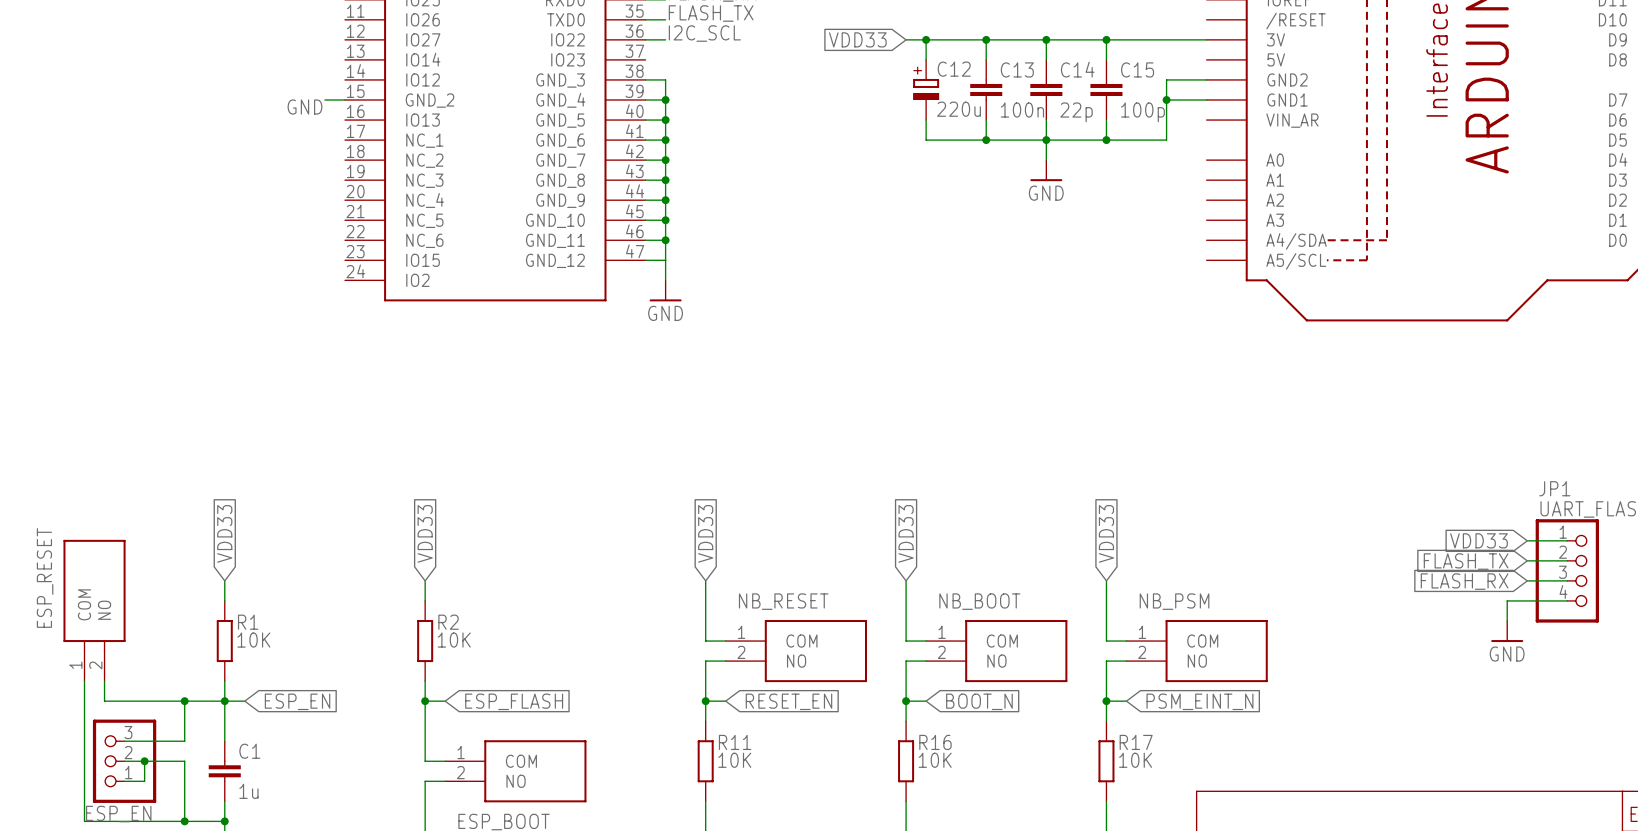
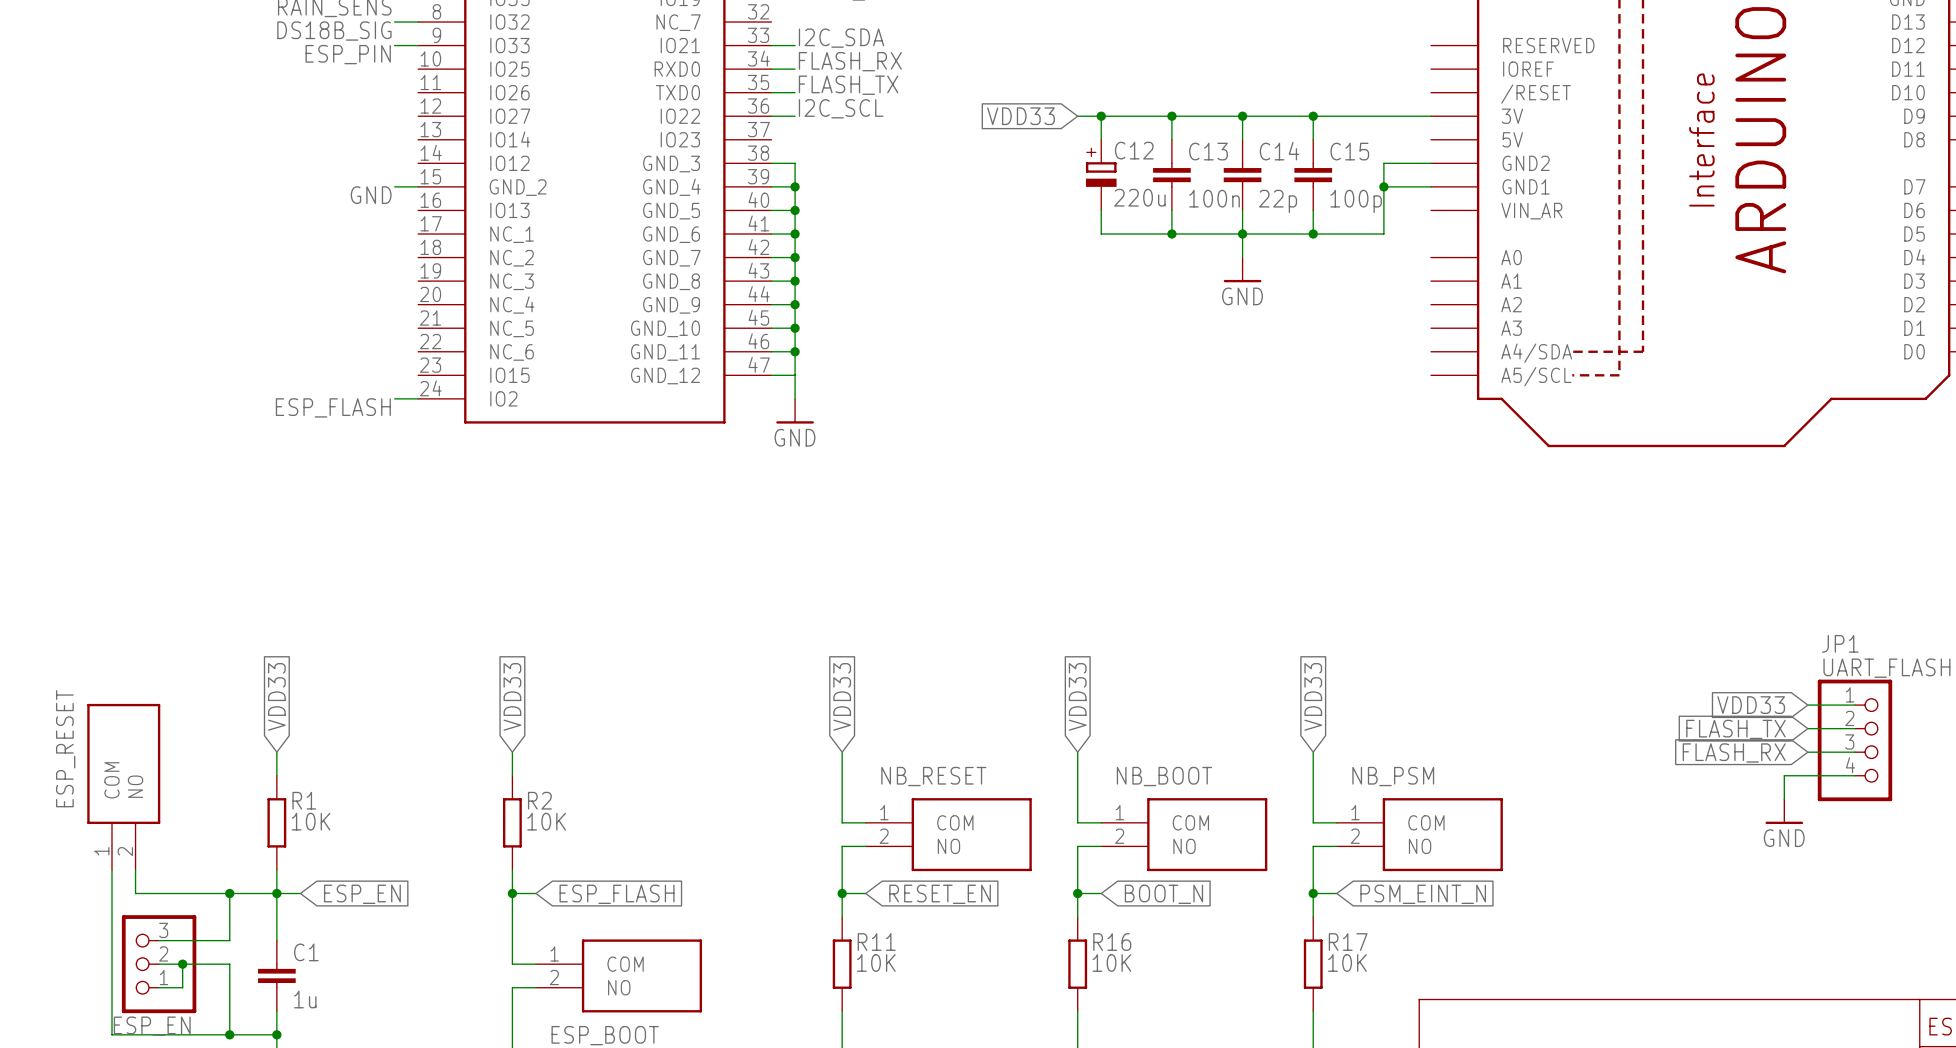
wire: none -> (394, 398) (418, 398)
label: none -> ESP_FLASH (333, 407)

